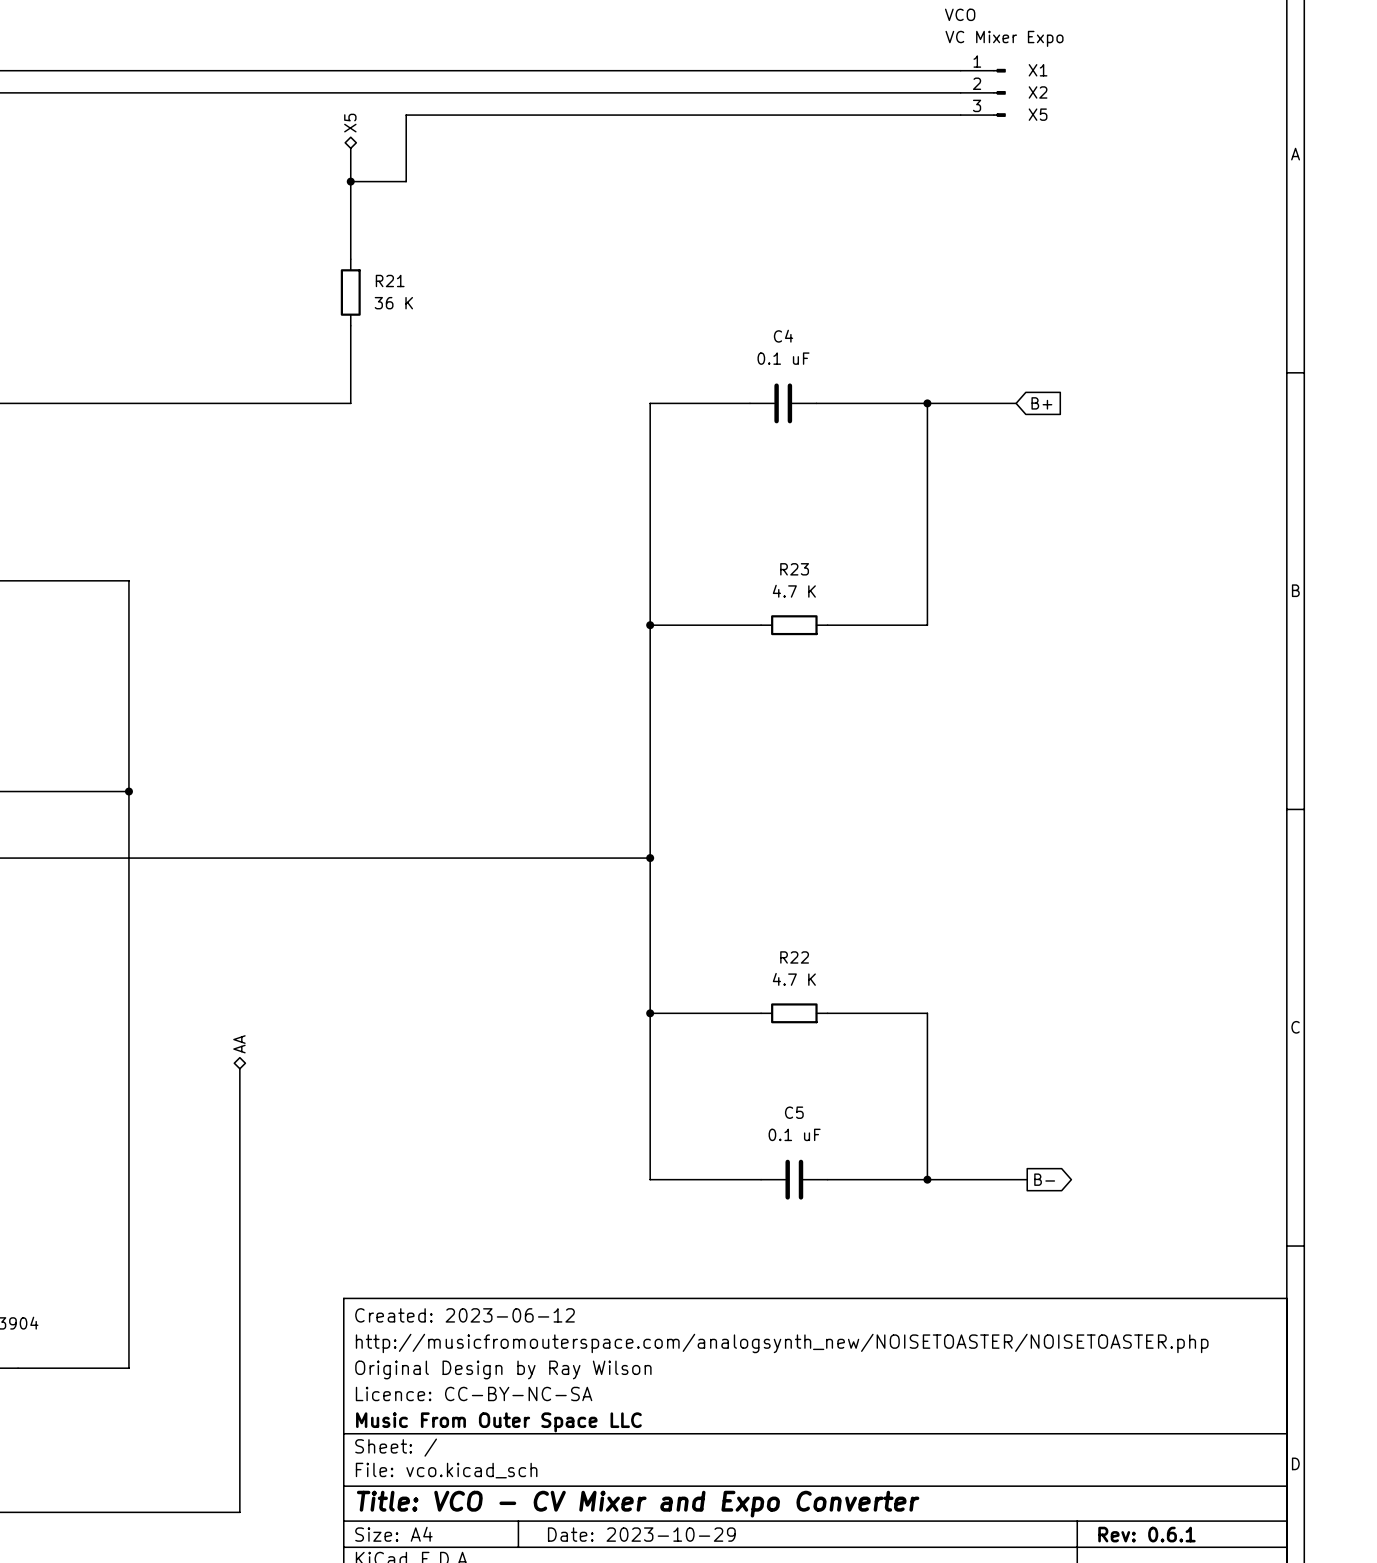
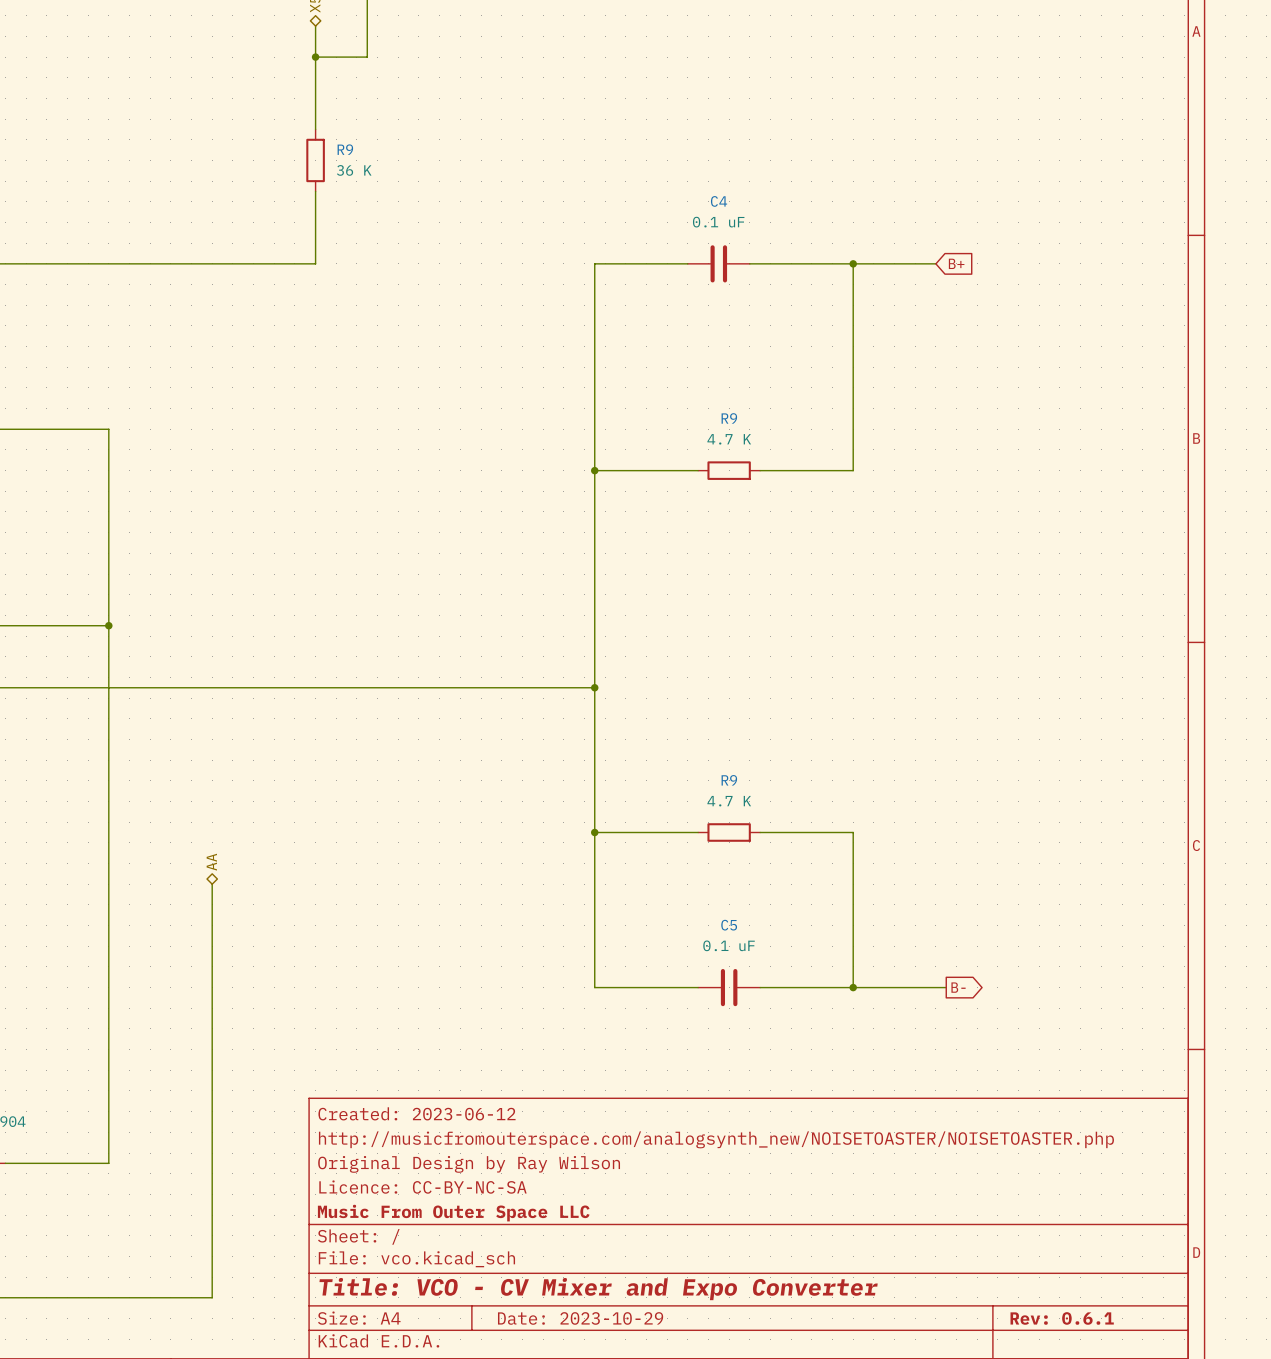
R21 name: R21 (390, 280) -> R9 (345, 149)
R23 name: R23 (794, 569) -> R9 (729, 418)
R22 name: R22 (794, 957) -> R9 (729, 780)

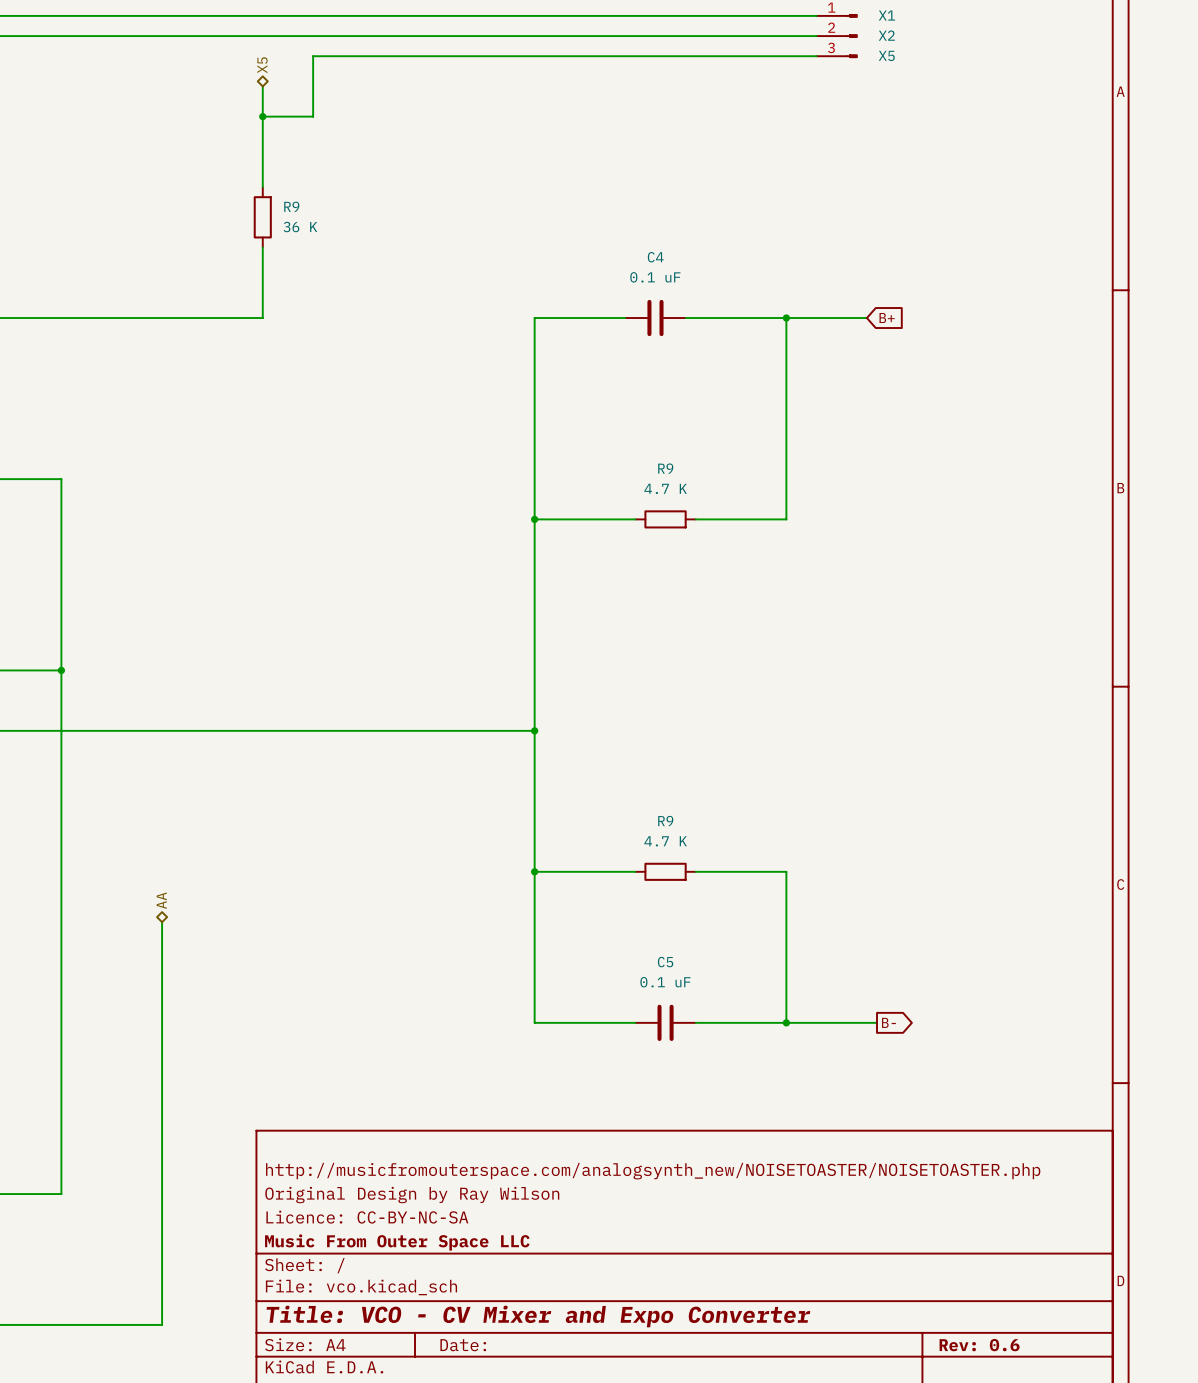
title block: Created: 2023-06-12 (417, 1113) -> none
title block: Date: 2023-10-29 (580, 1318) -> Date: (463, 1345)
title block: Rev: 0.6.1 (1062, 1318) -> Rev: 0.6 (979, 1345)

